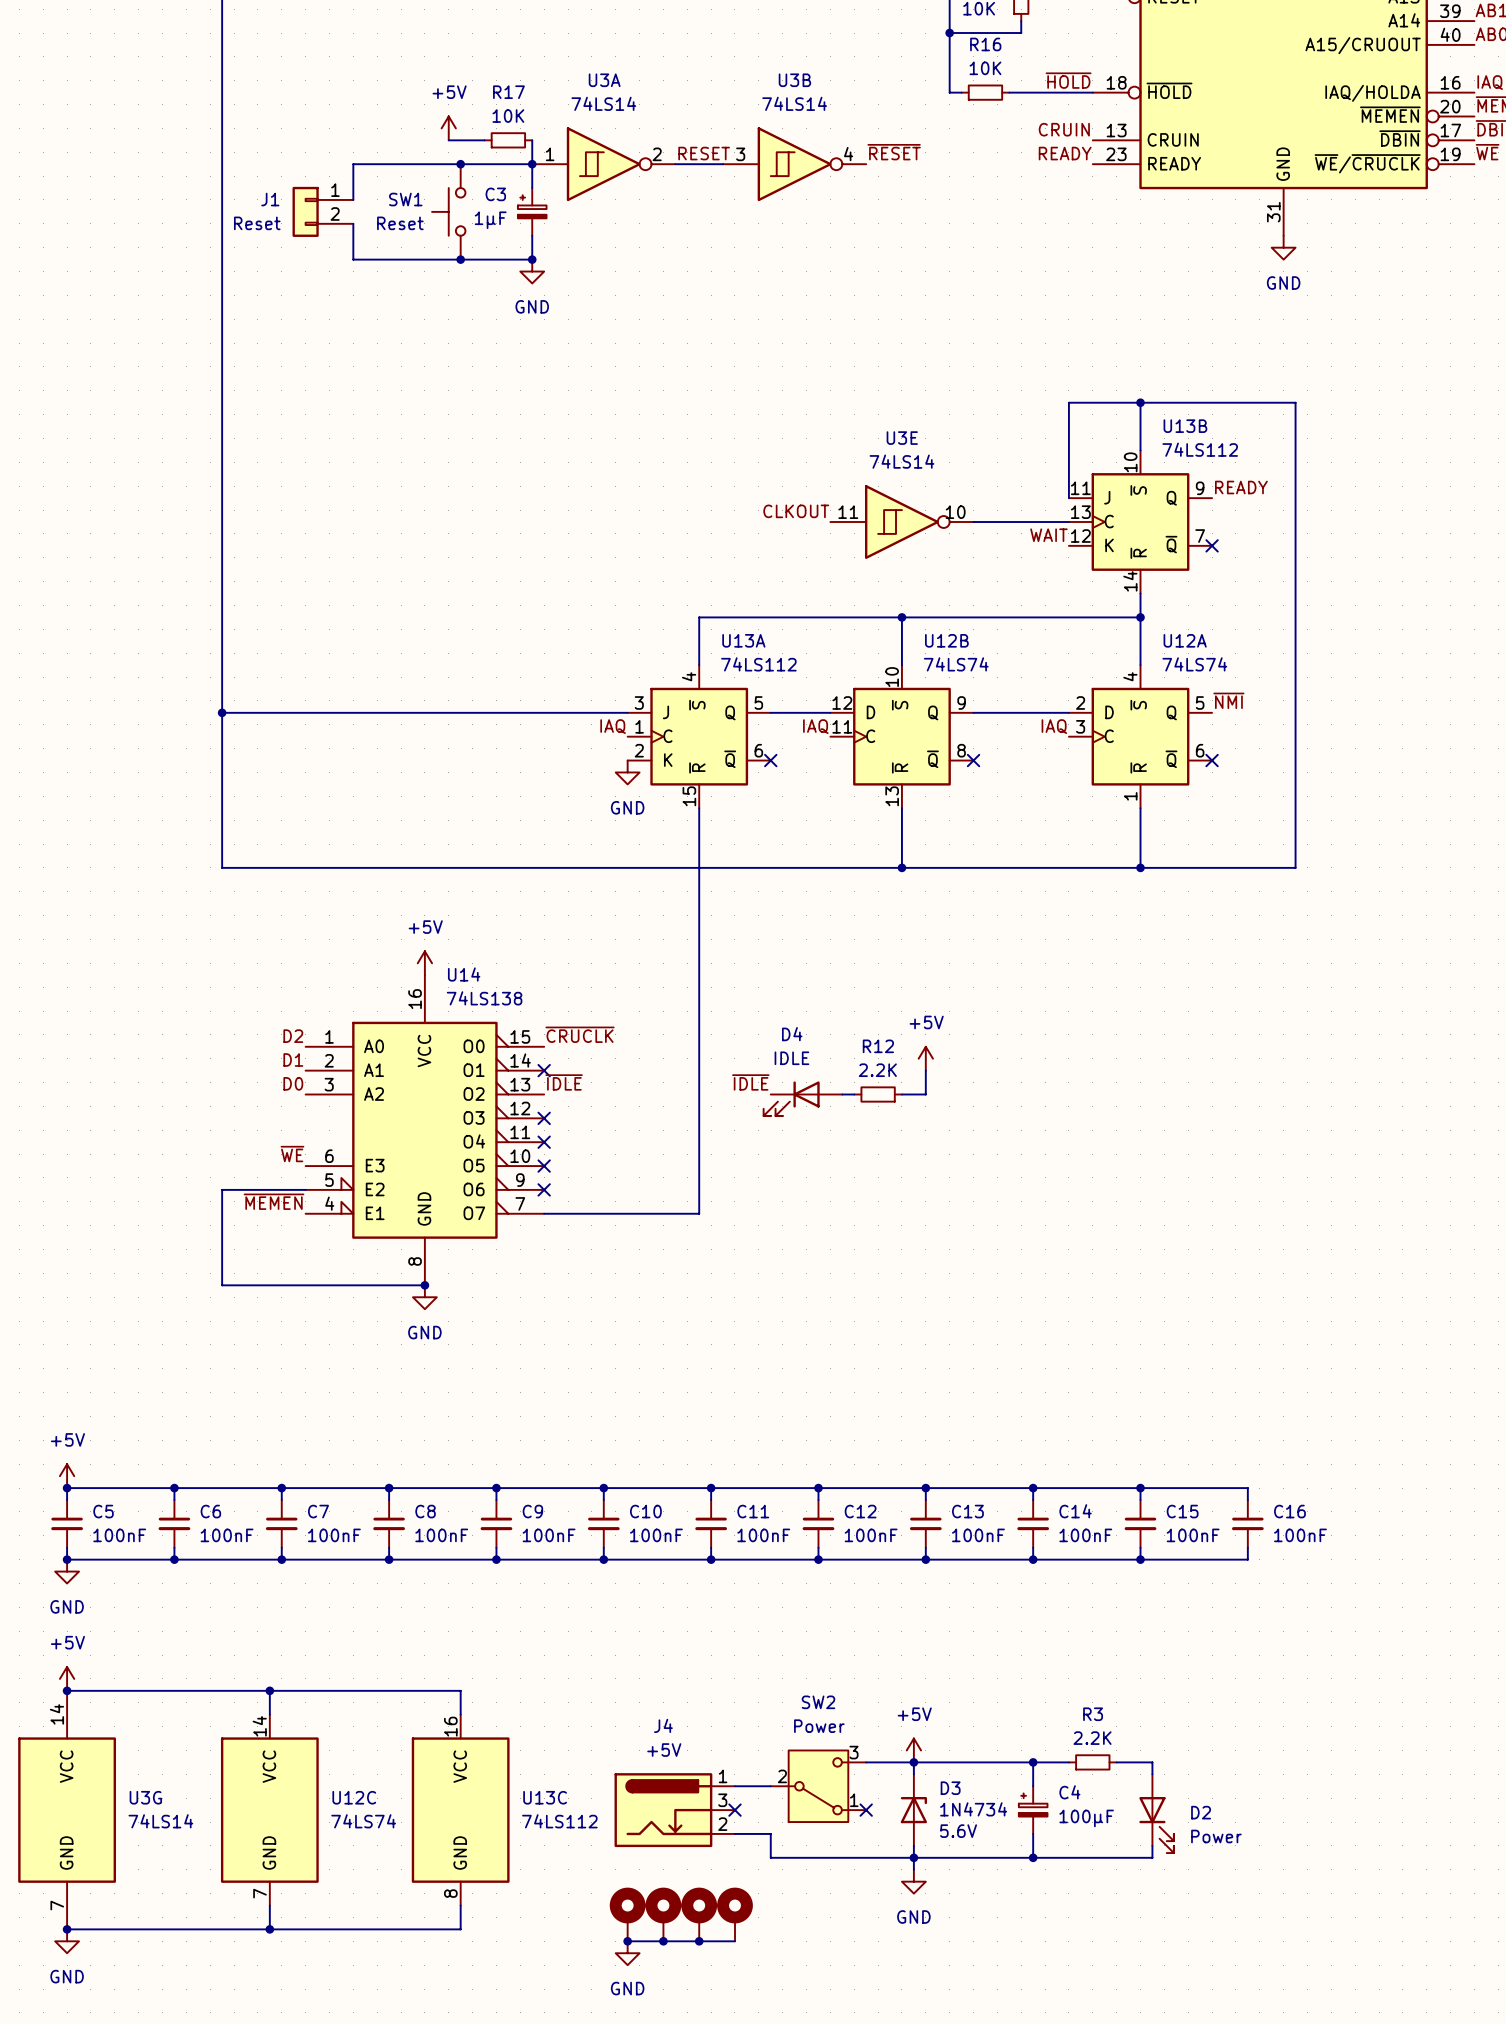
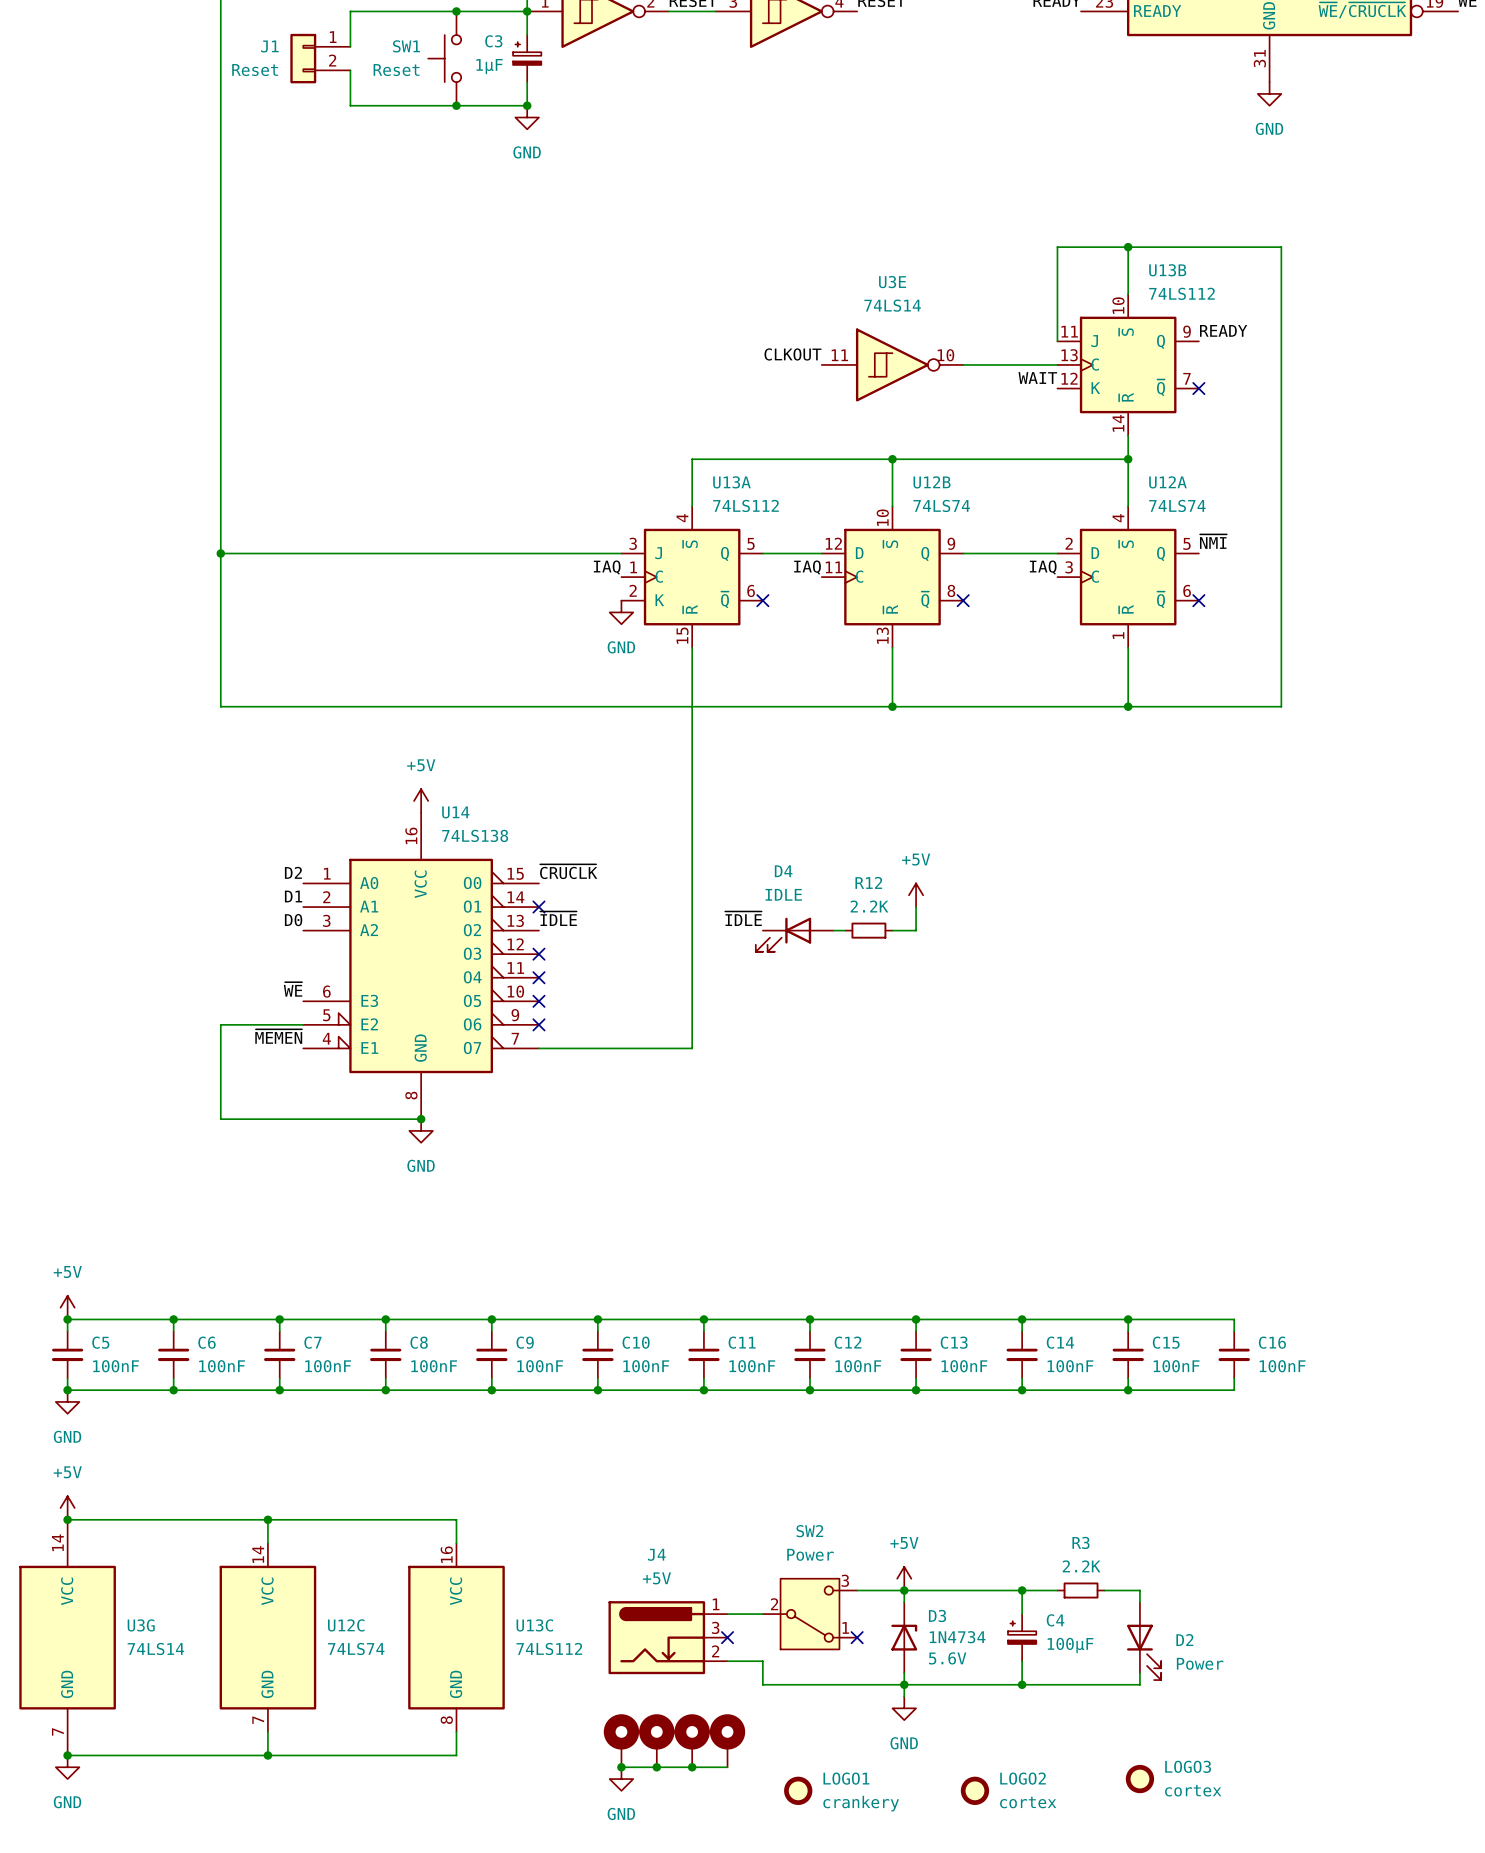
LOGO3: none -> cortex (1139, 1779)
LOGO1: none -> crankery (798, 1790)
LOGO2: none -> cortex (974, 1790)

